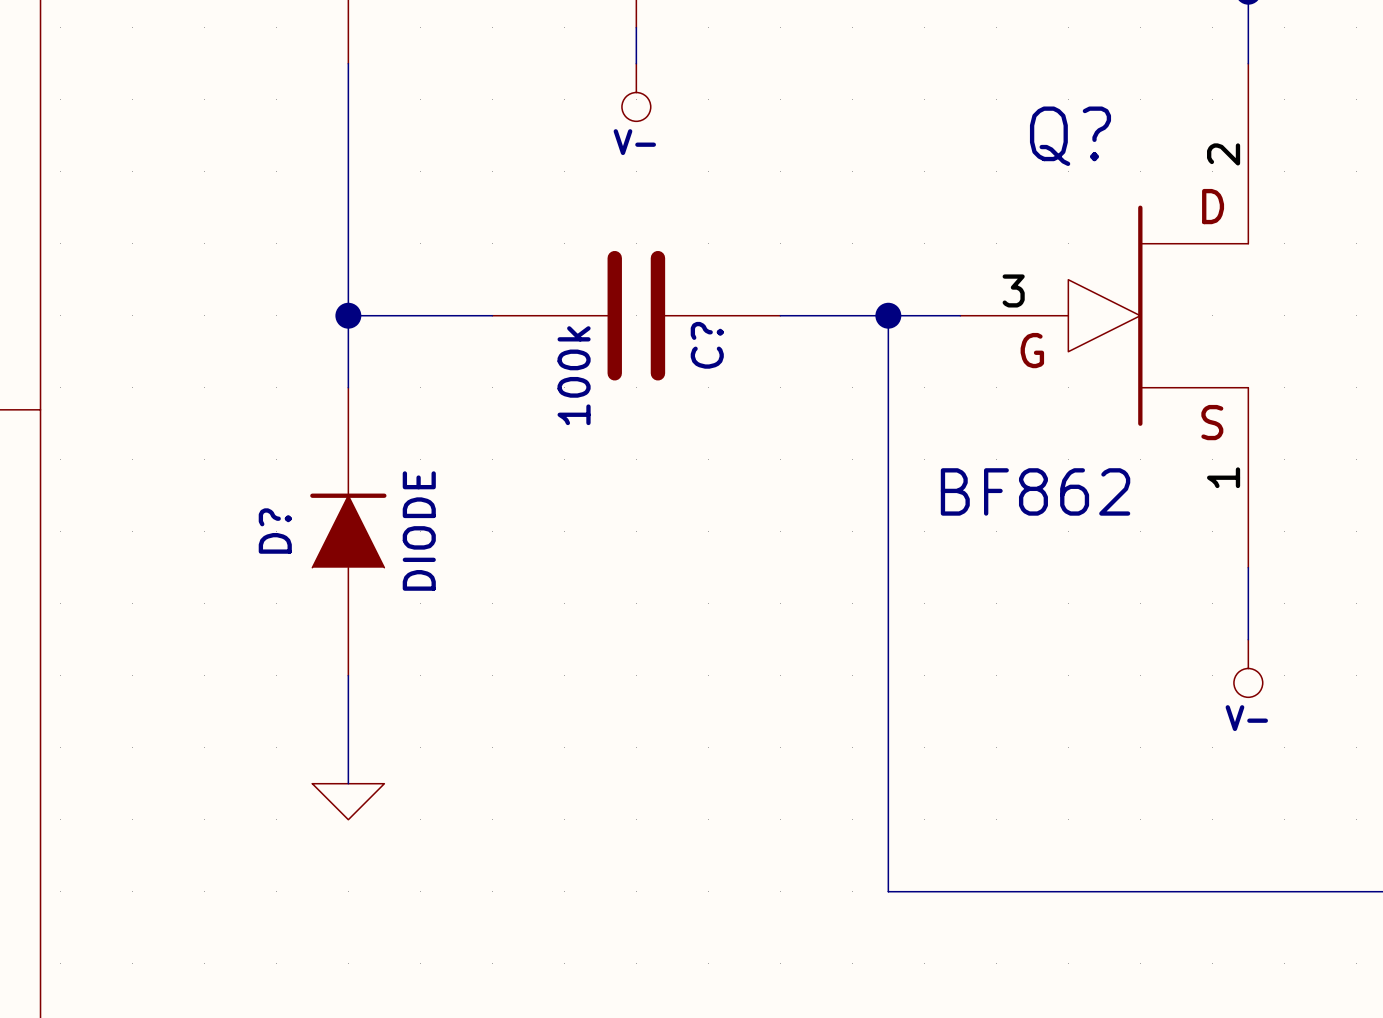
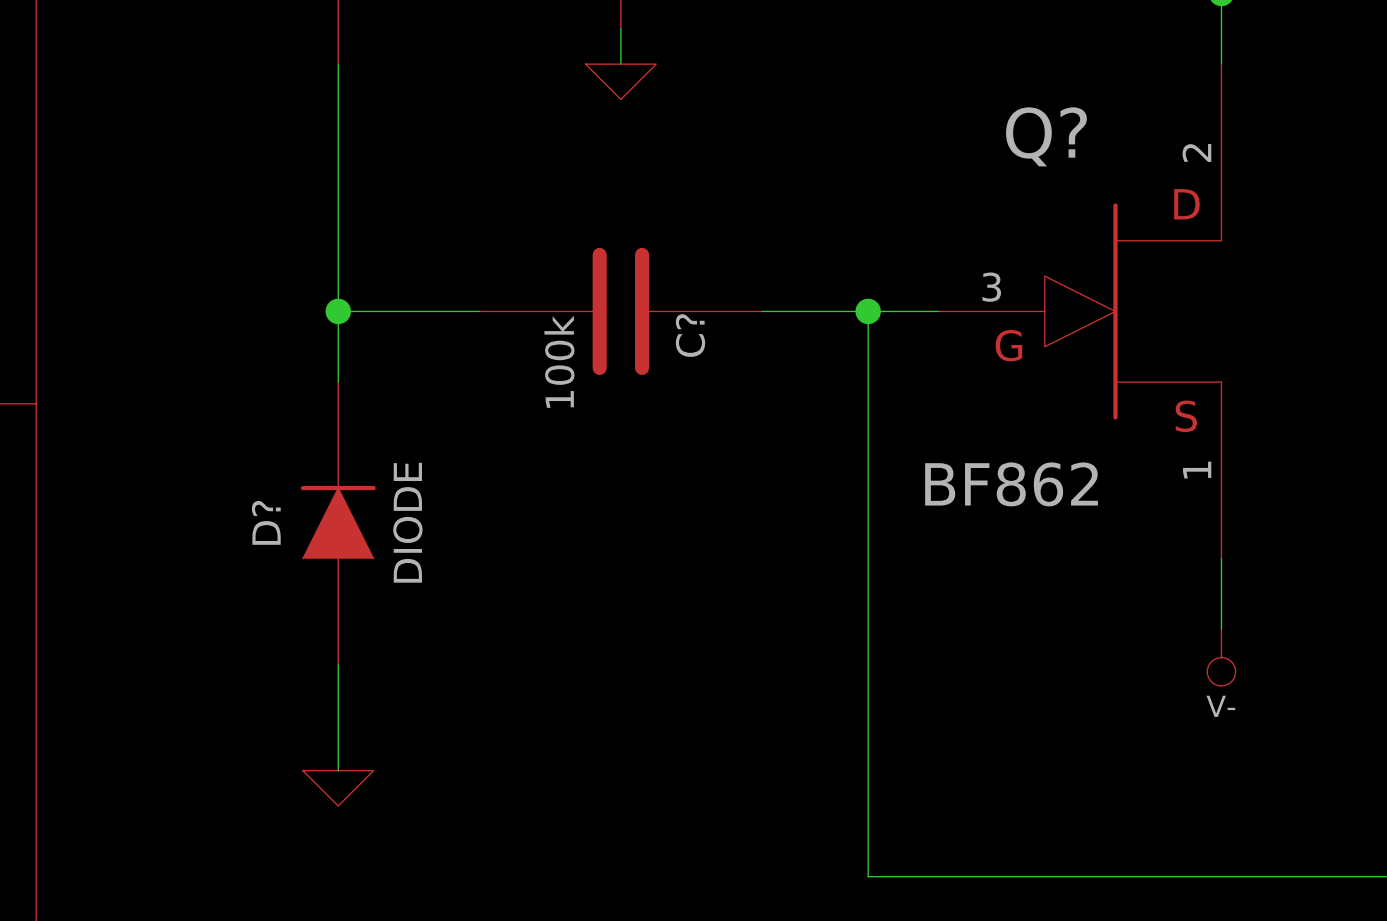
power symbol shape: [621, 63, 651, 122] -> [585, 64, 657, 100]
power symbol text: V- (634, 142) -> none

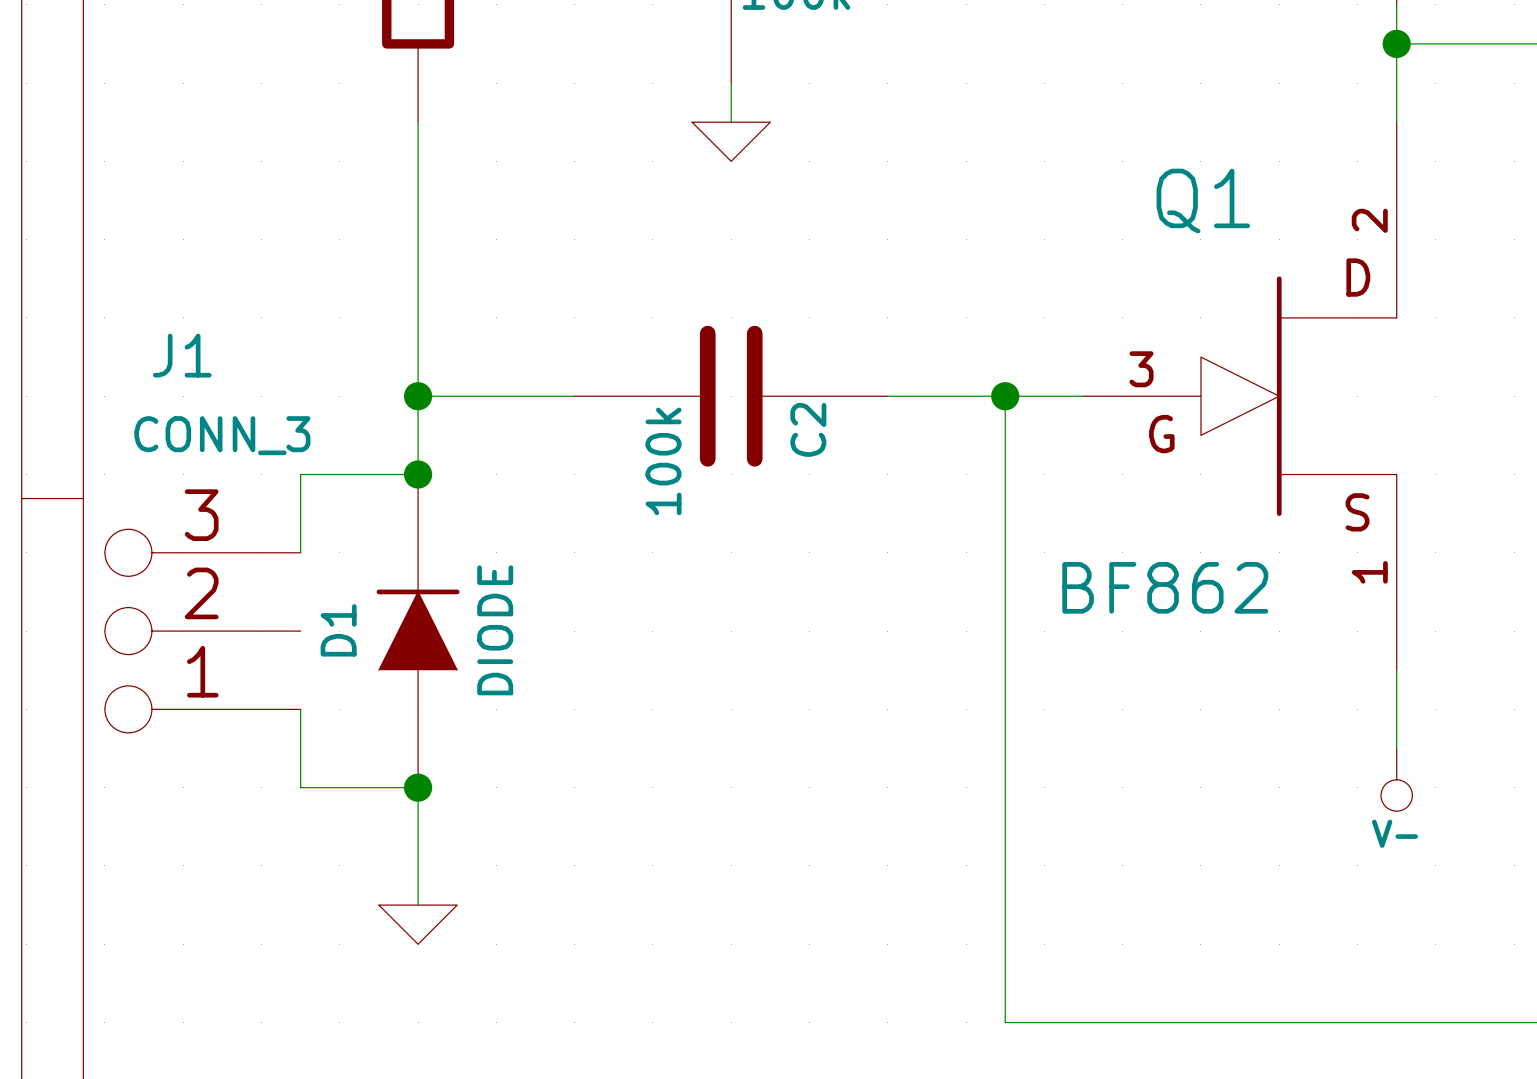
Q? name: Q? (1046, 136) -> Q1 (1203, 201)
C? name: C? (690, 335) -> C2 (808, 429)
wire: none -> (418, 474) (300, 474) (300, 552)
junction: none -> (418, 474)
D? name: D? (266, 522) -> D1 (338, 630)
J1: none -> CONN_3 (202, 631)
wire: none -> (300, 709) (300, 787) (418, 787)
junction: none -> (418, 787)

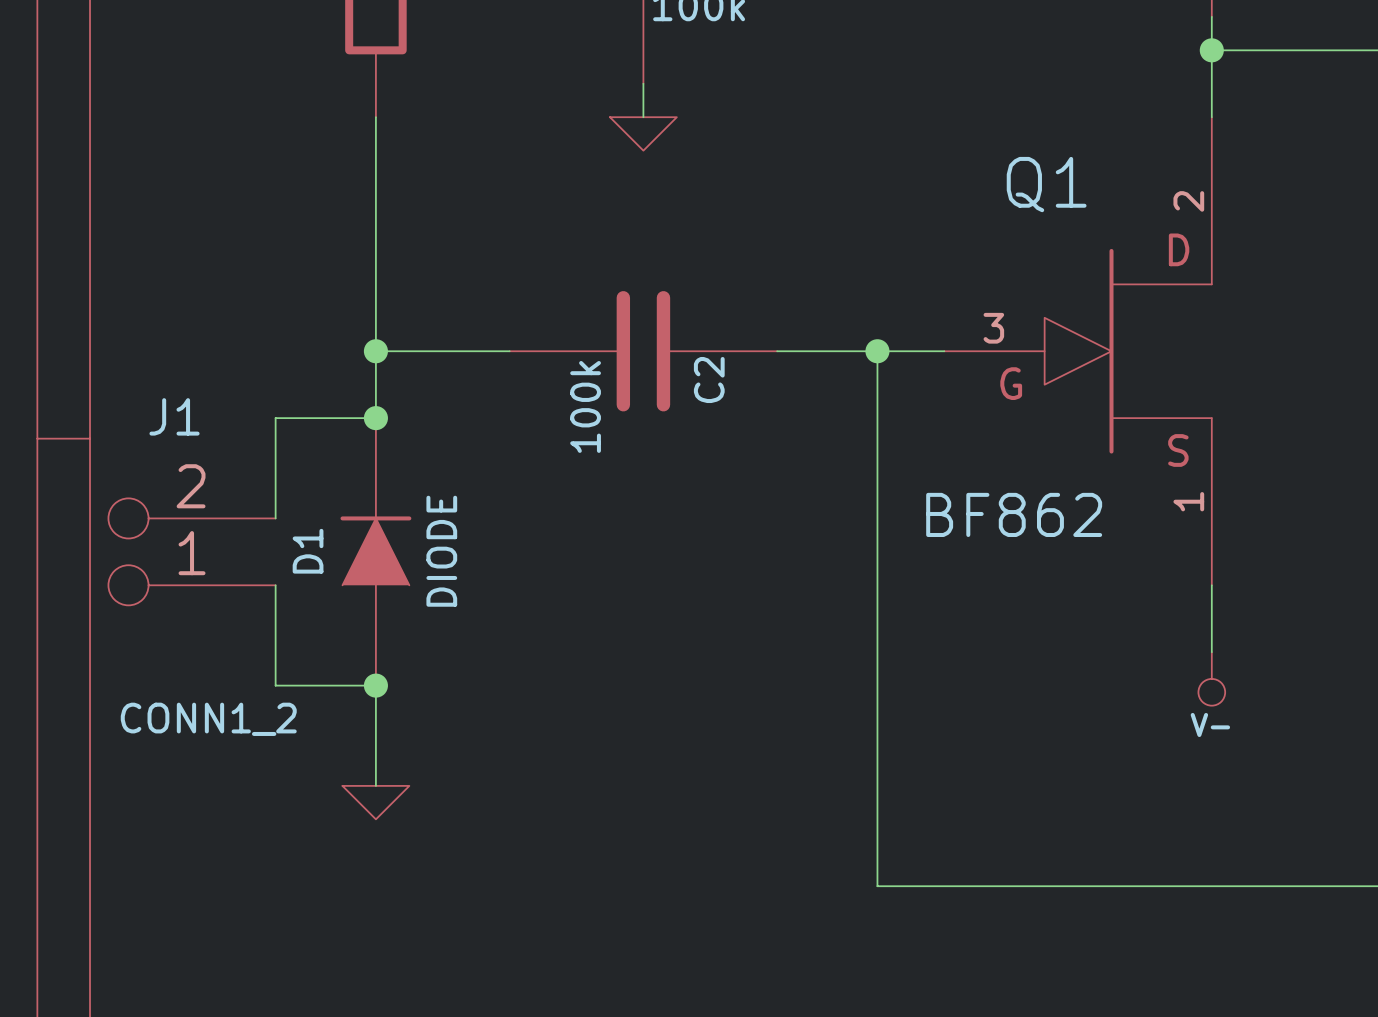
J1 name position: J1 (182, 355) -> J1 (174, 416)
J1 value: CONN_3 (222, 435) -> CONN1_2 (208, 719)
J1 symbol: [104, 529, 301, 733] -> [108, 498, 276, 606]
wire: none -> (275, 484) (275, 518)
wire: none -> (275, 585) (275, 618)

